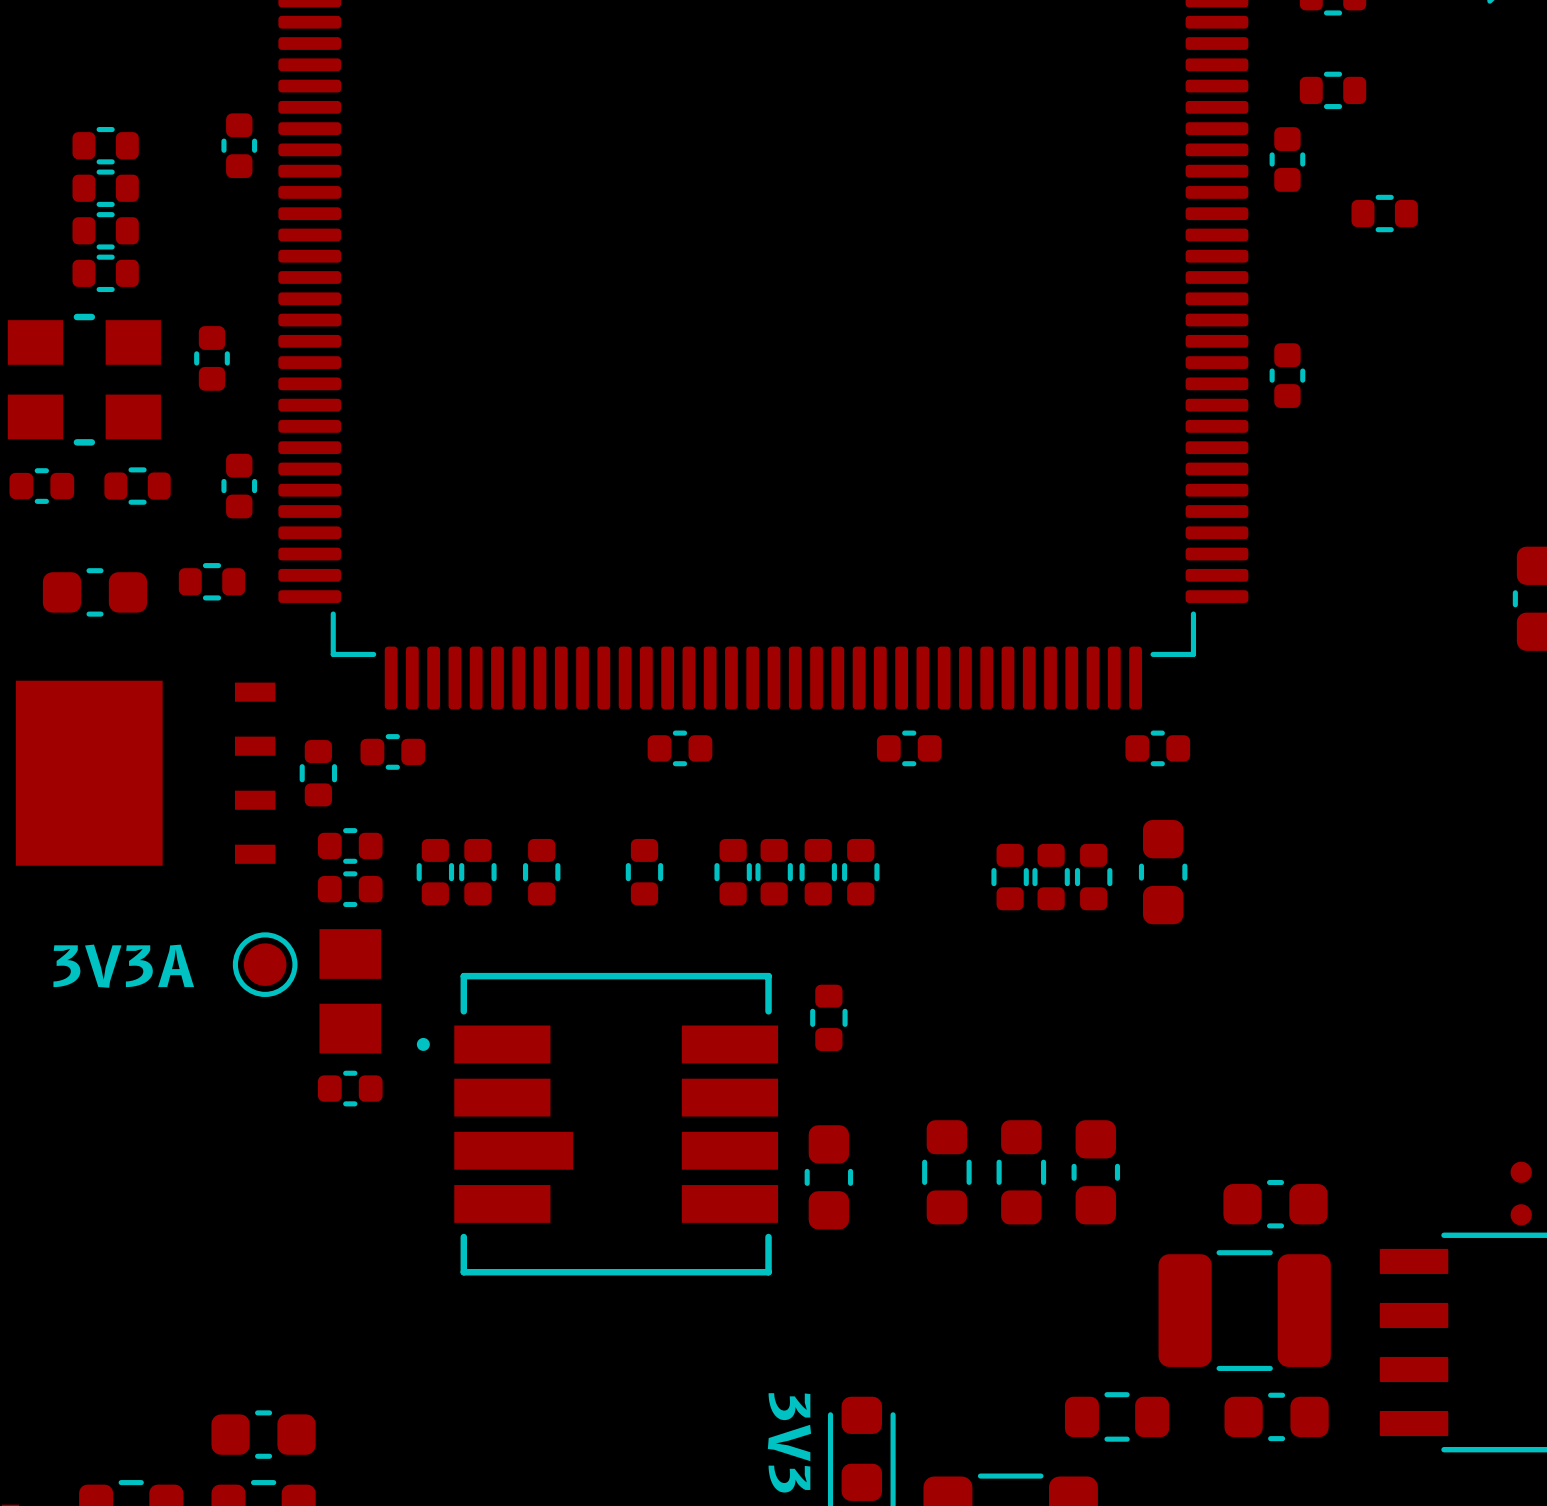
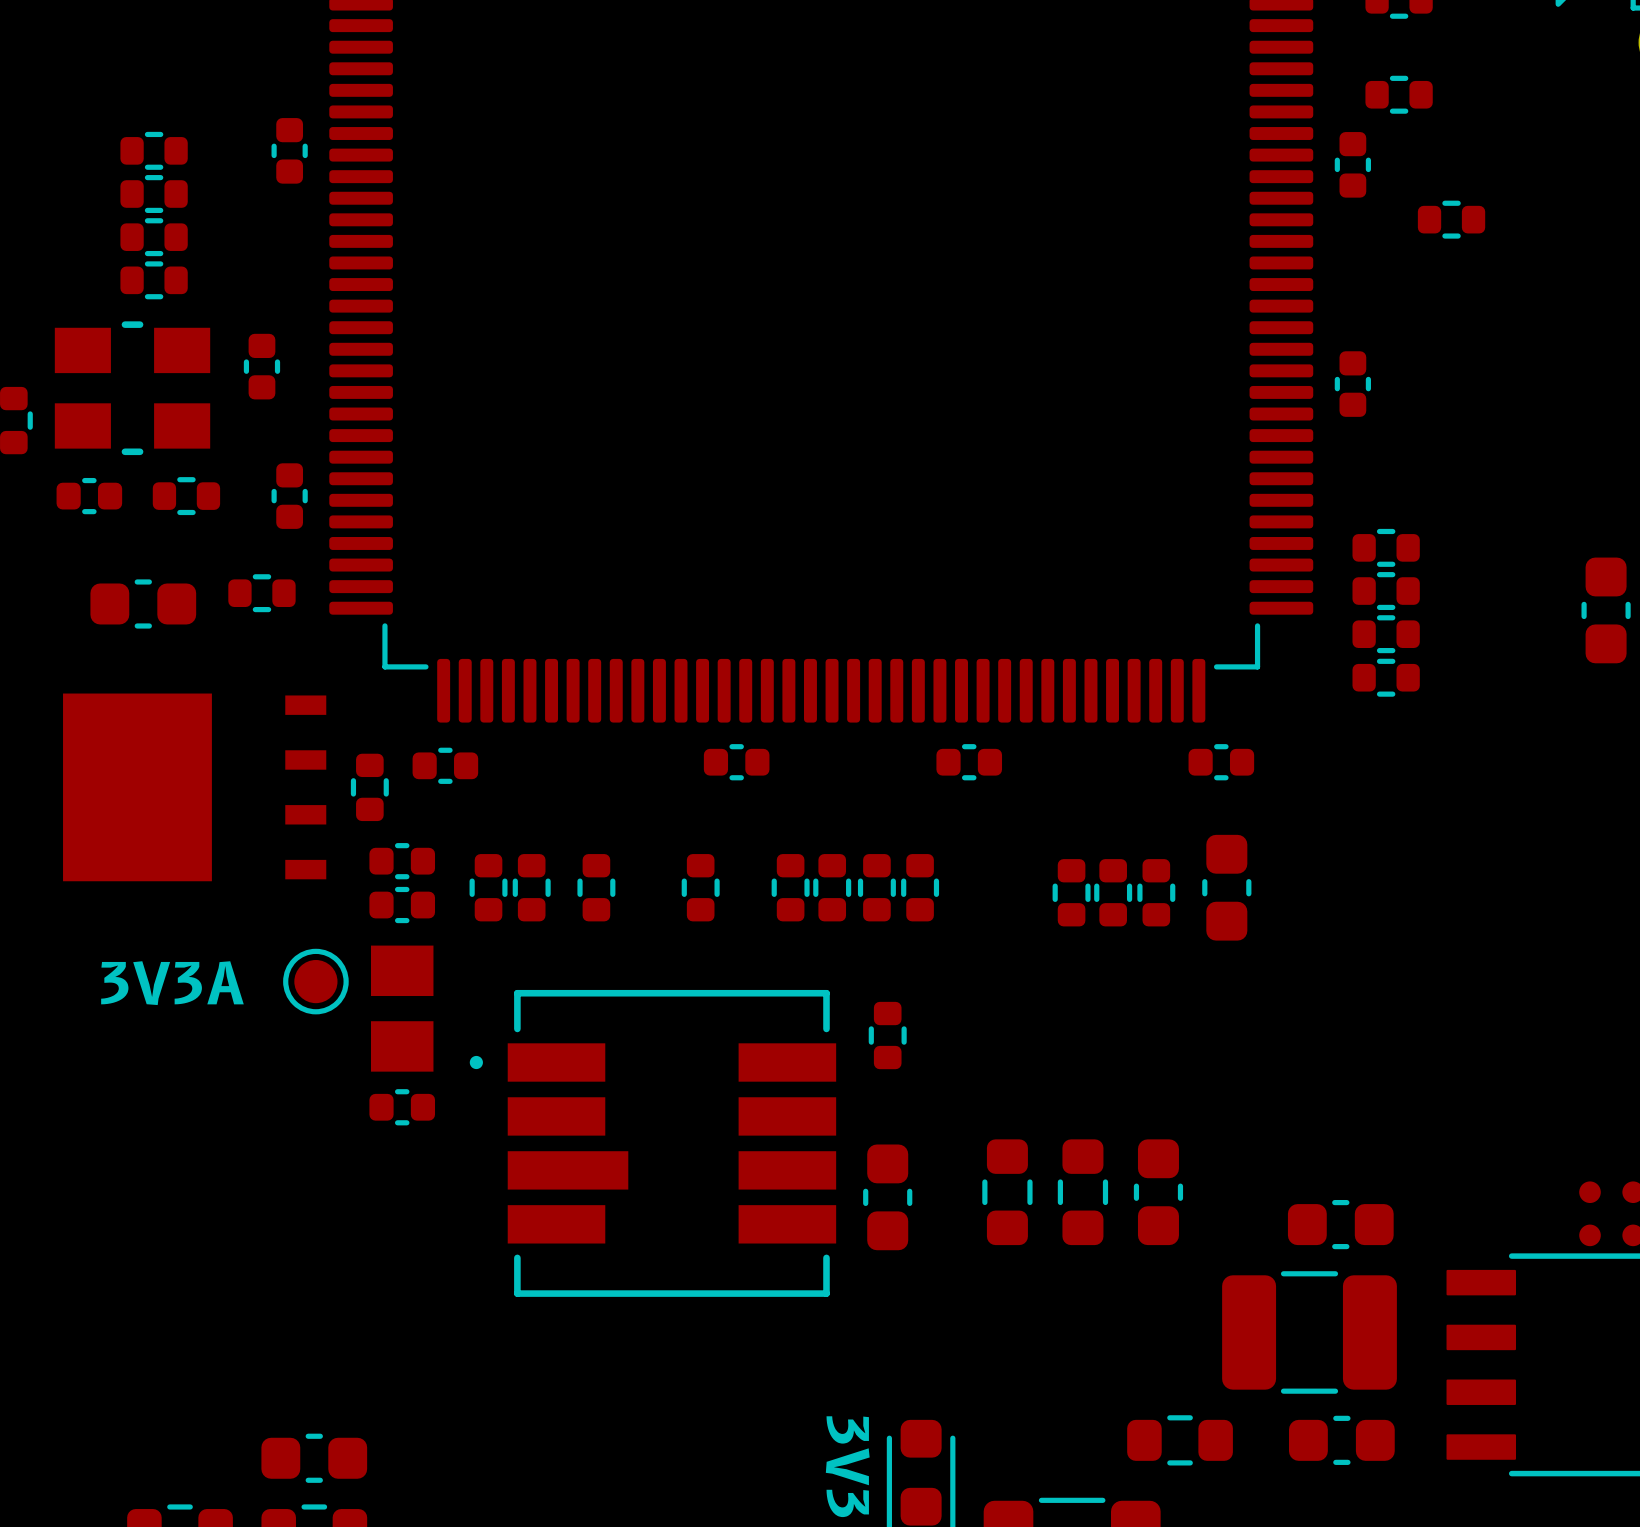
part: none -> (1386, 547)
part: none -> (1386, 591)
part: none -> (1386, 634)
part: none -> (1386, 677)

